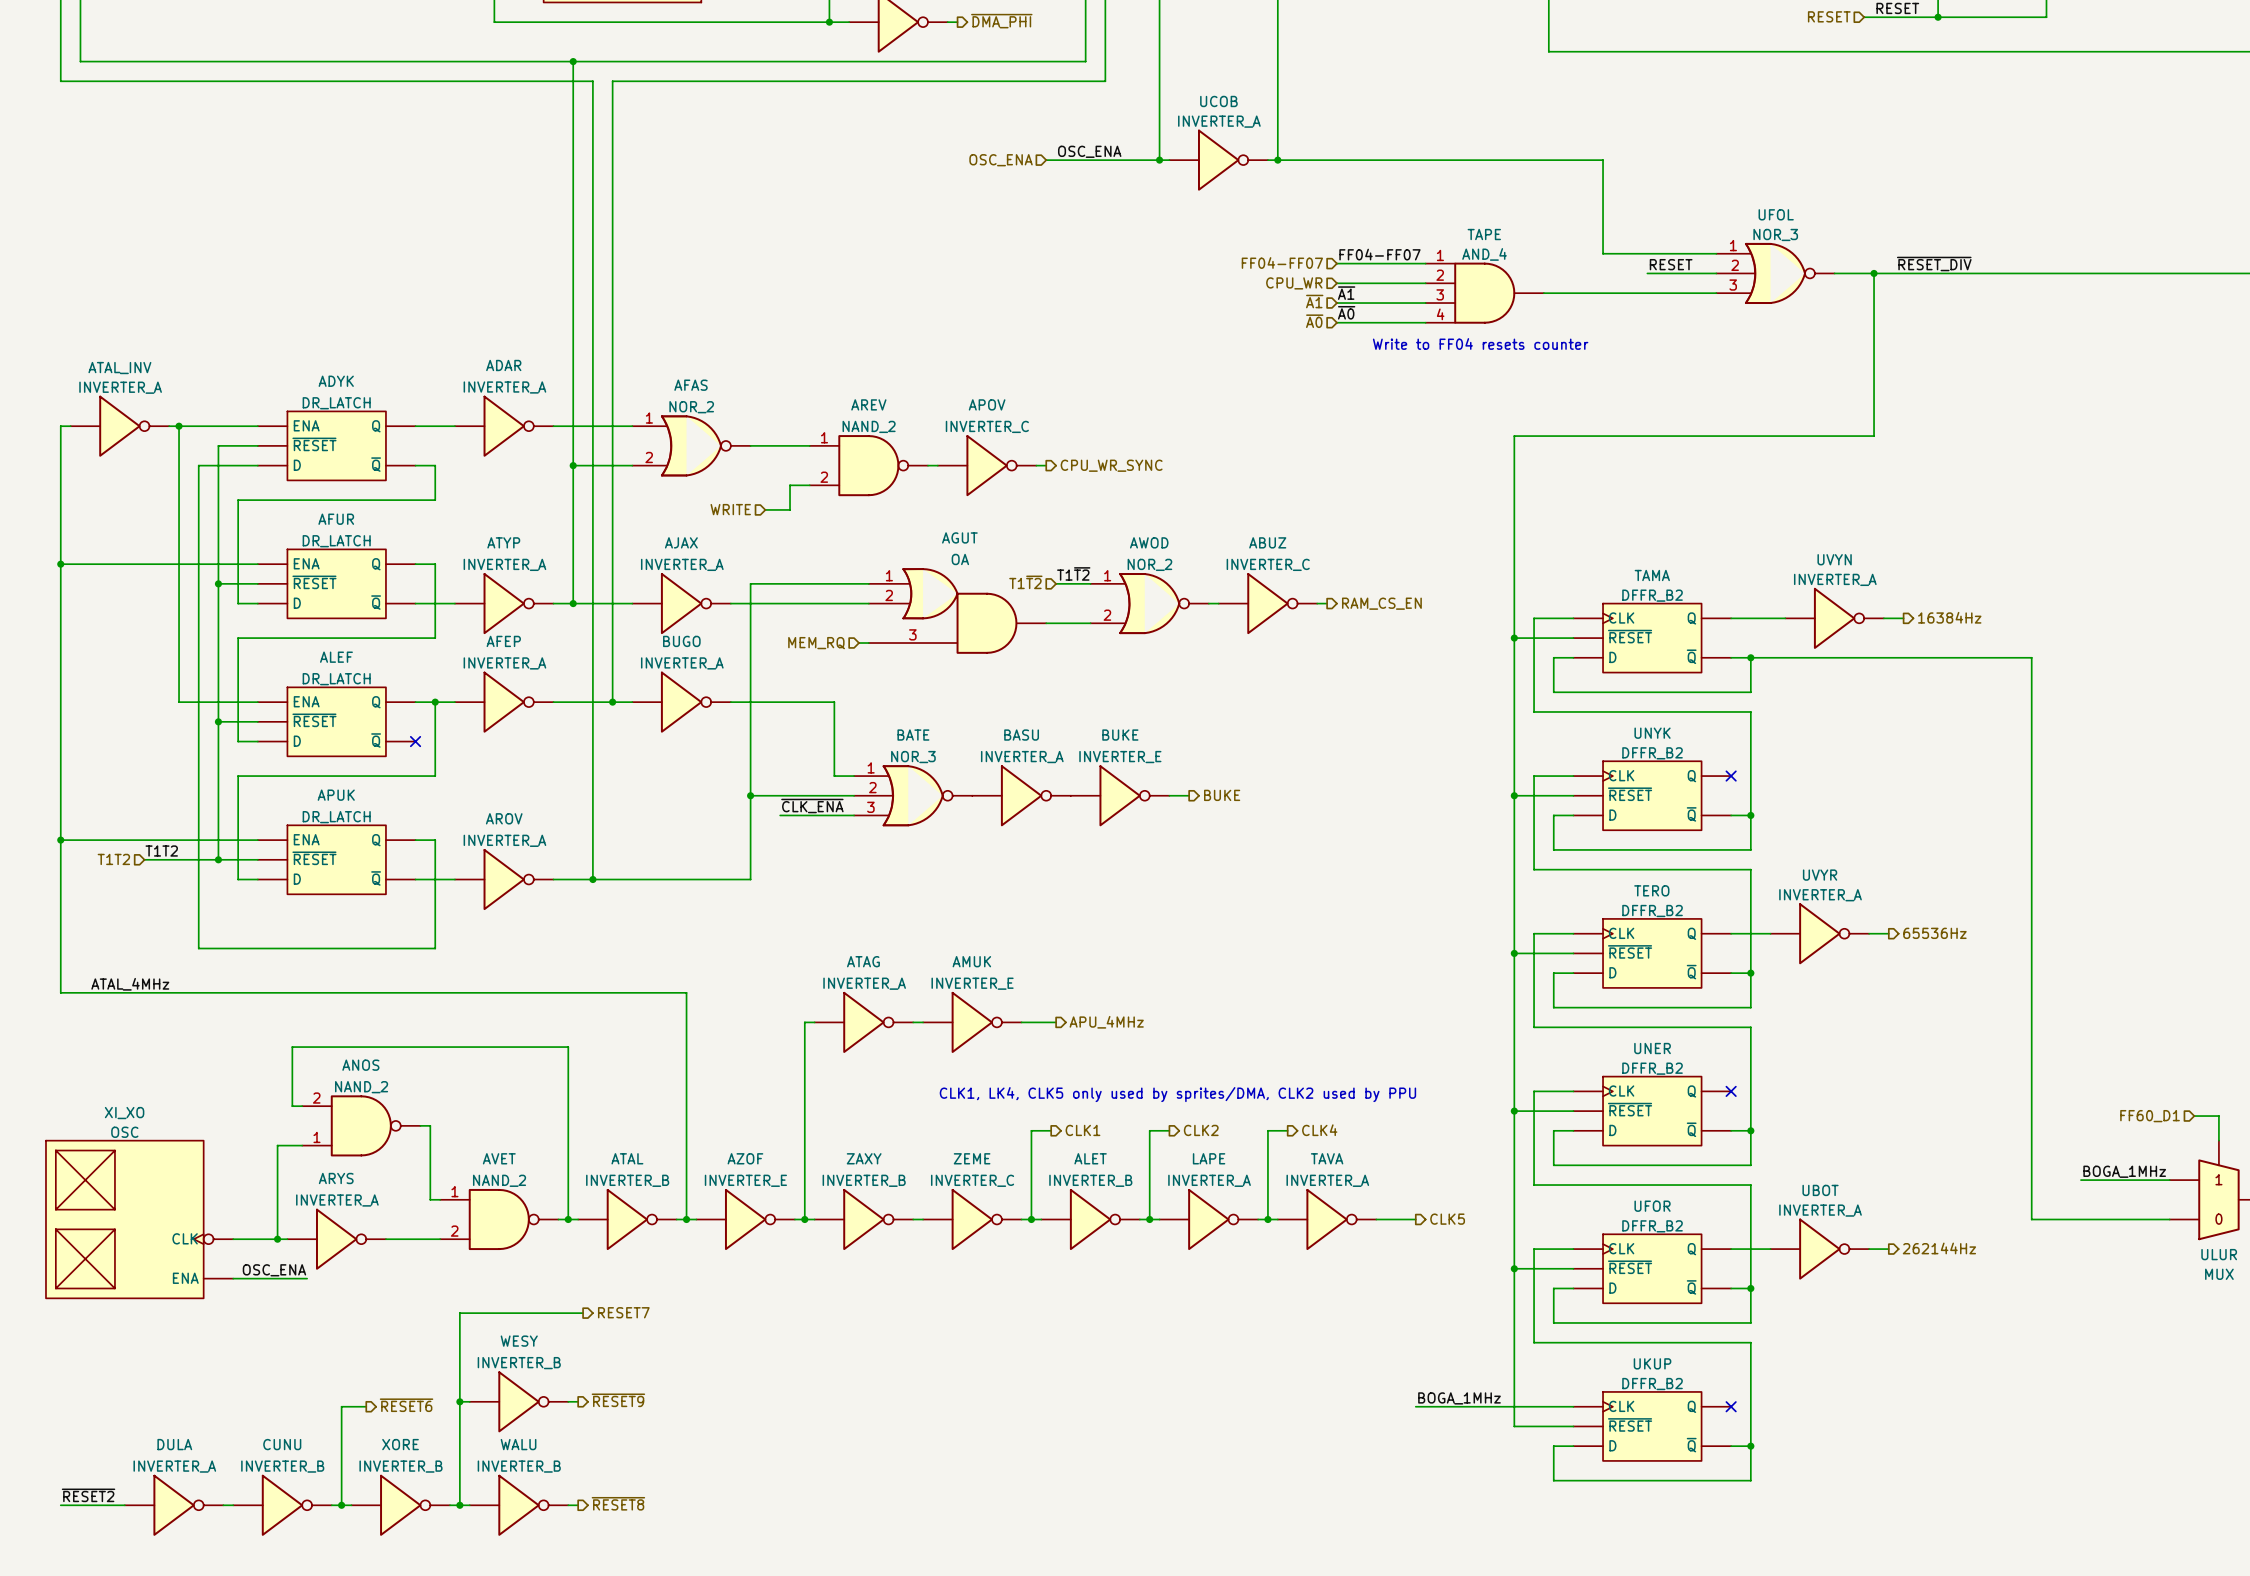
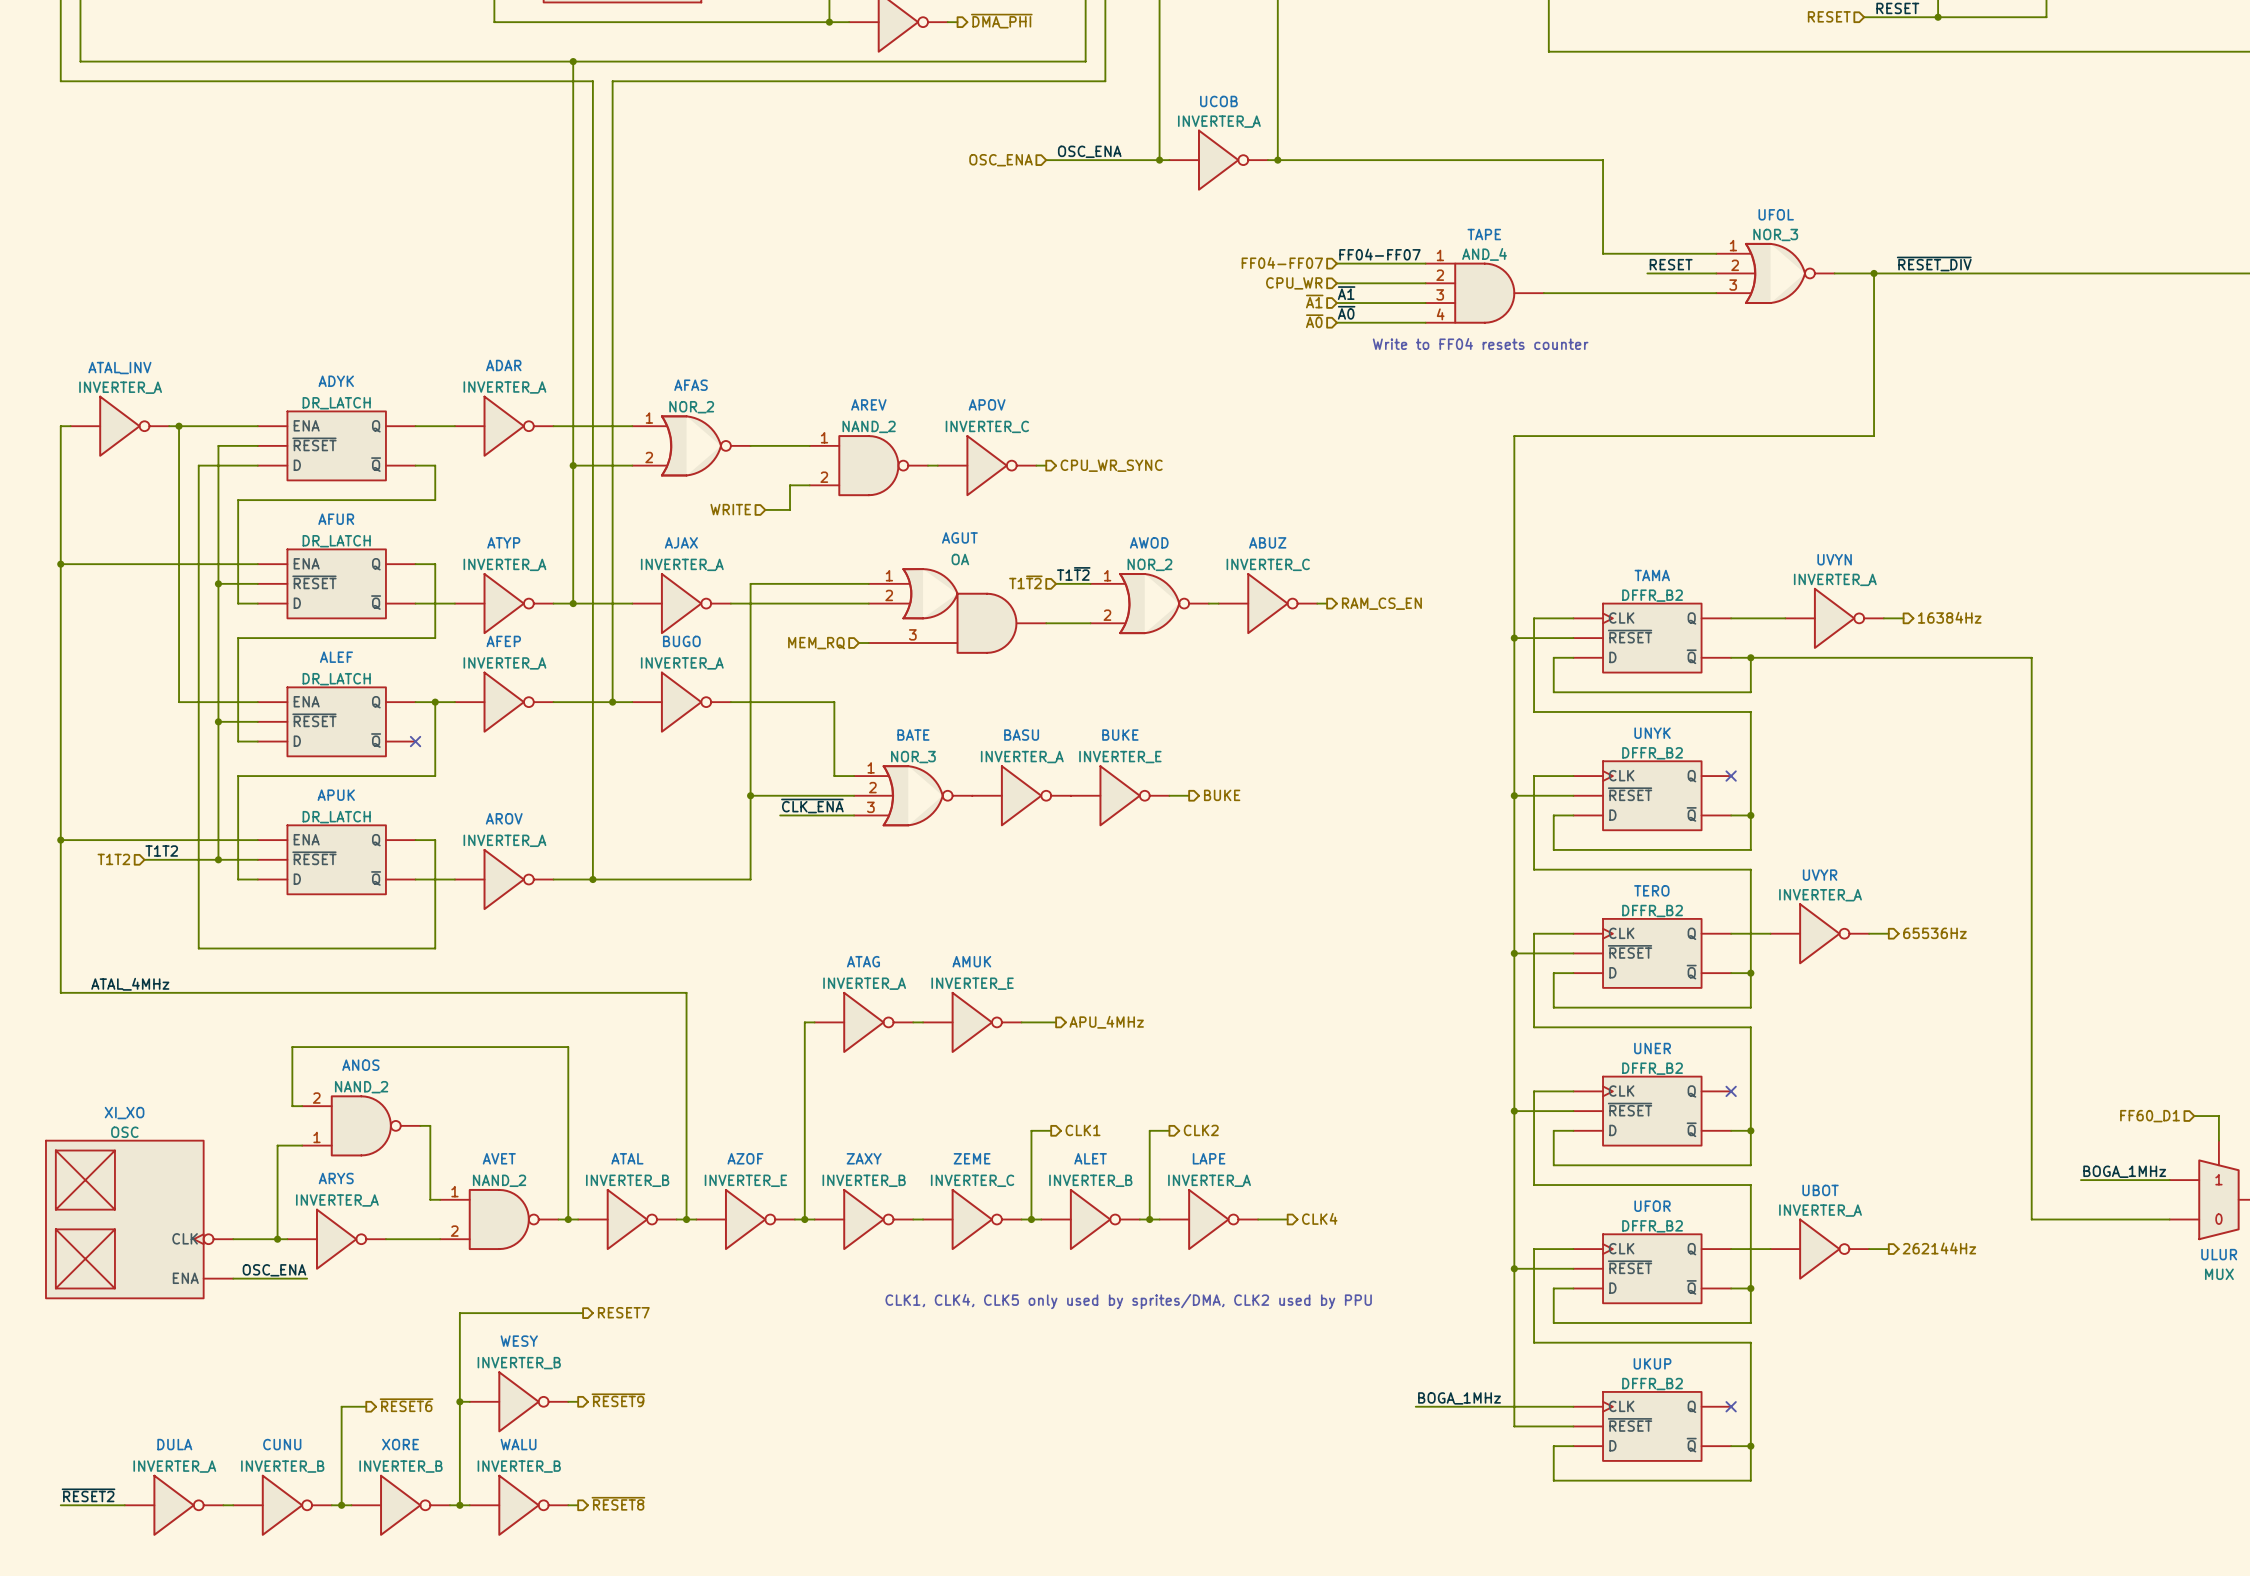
text: CLK1, LK4, CLK5 only used by sprites/DMA, CLK2 used by PPU (1177, 1094) -> none
wire: (1287, 1130) (1267, 1130) (1267, 1219) -> none
hierarchical label position: CLK4 (1319, 1130) -> CLK4 (1319, 1218)
junction: (1267, 1219) -> none
TAVA: INVERTER_A (1327, 1219) -> none
wire: (1376, 1219) (1415, 1219) -> none
hierarchical label: CLK5 (1447, 1219) -> none
text: none -> CLK1, CLK4, CLK5 only used by sprites/DMA, CLK2 used by PPU (1128, 1301)

